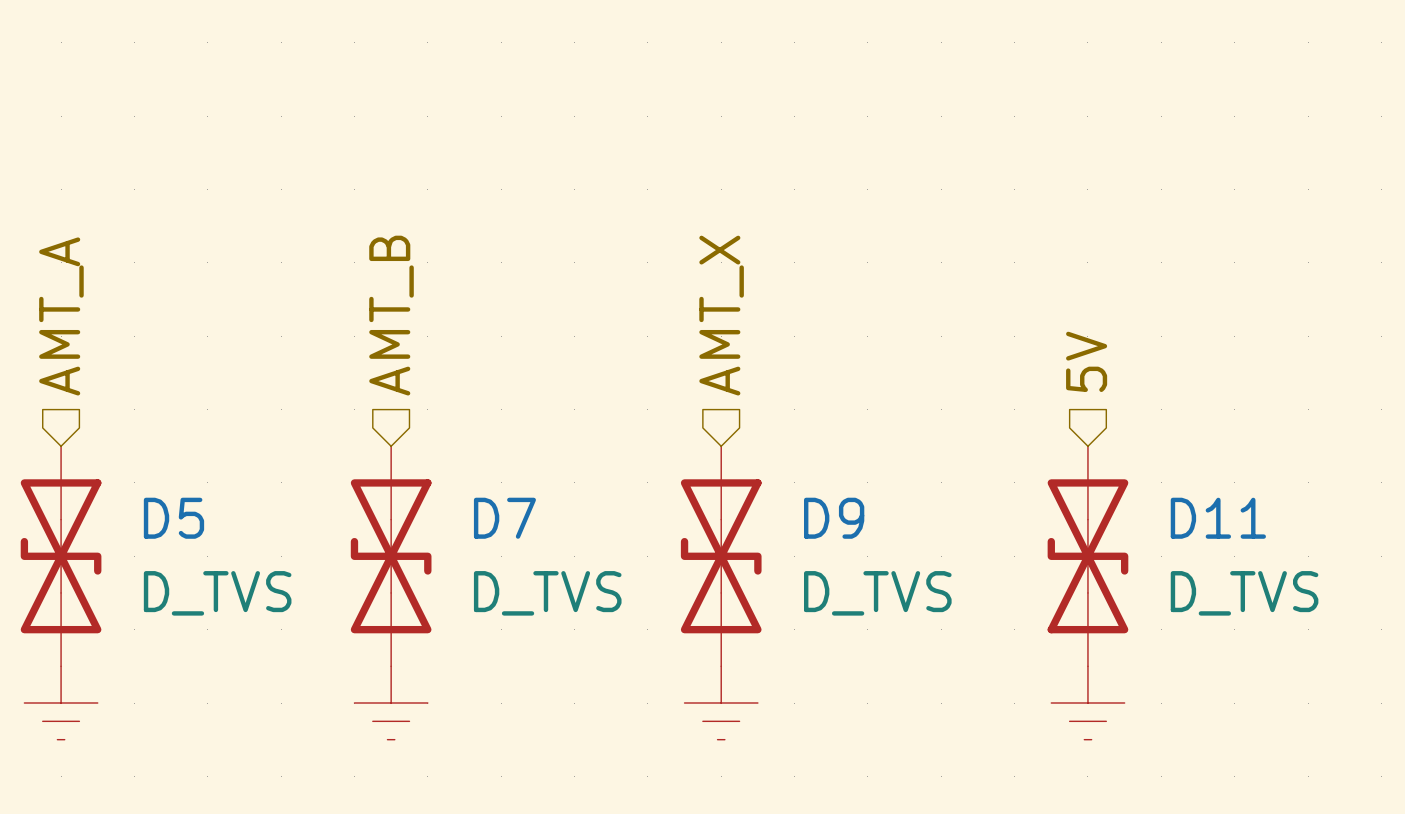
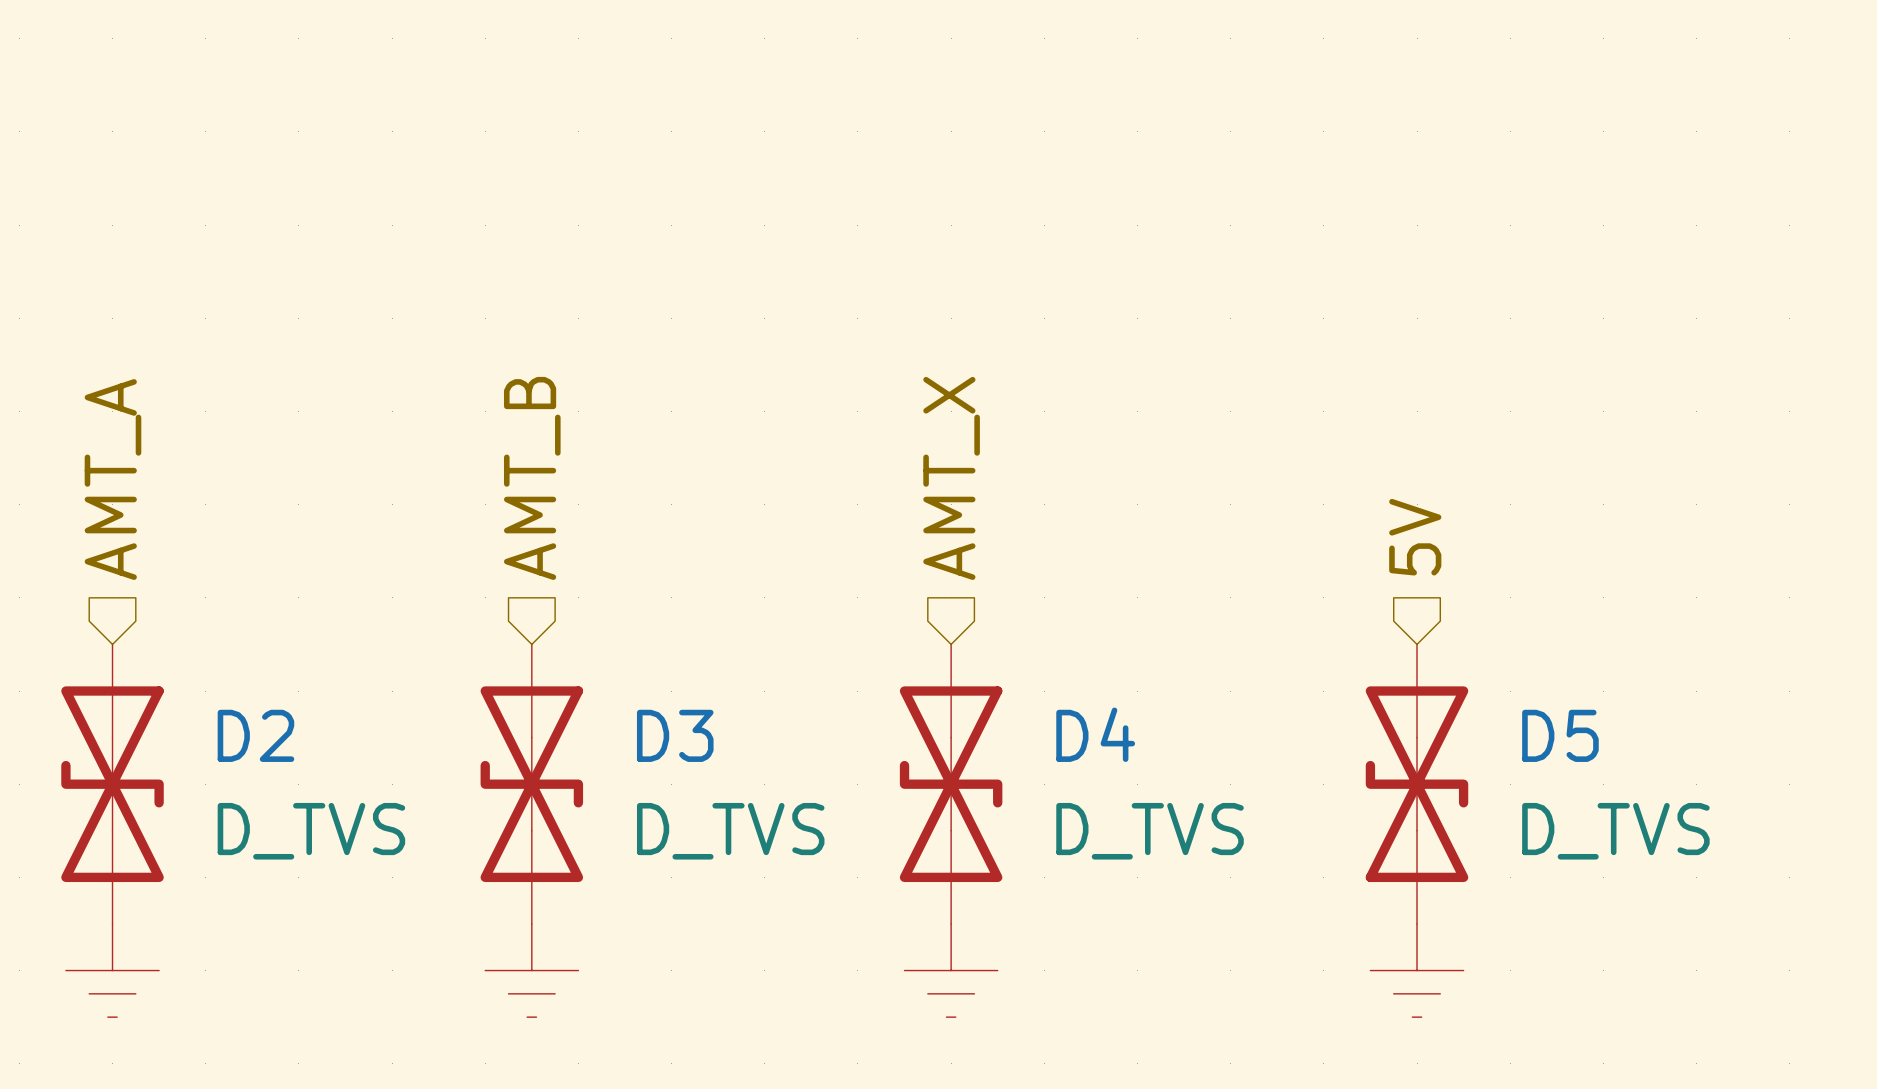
D5 name: D5 (173, 518) -> D2 (255, 735)
D7 name: D7 (504, 518) -> D3 (675, 735)
D9 name: D9 (834, 518) -> D4 (1095, 734)
D11 name: D11 (1218, 518) -> D5 (1560, 735)

